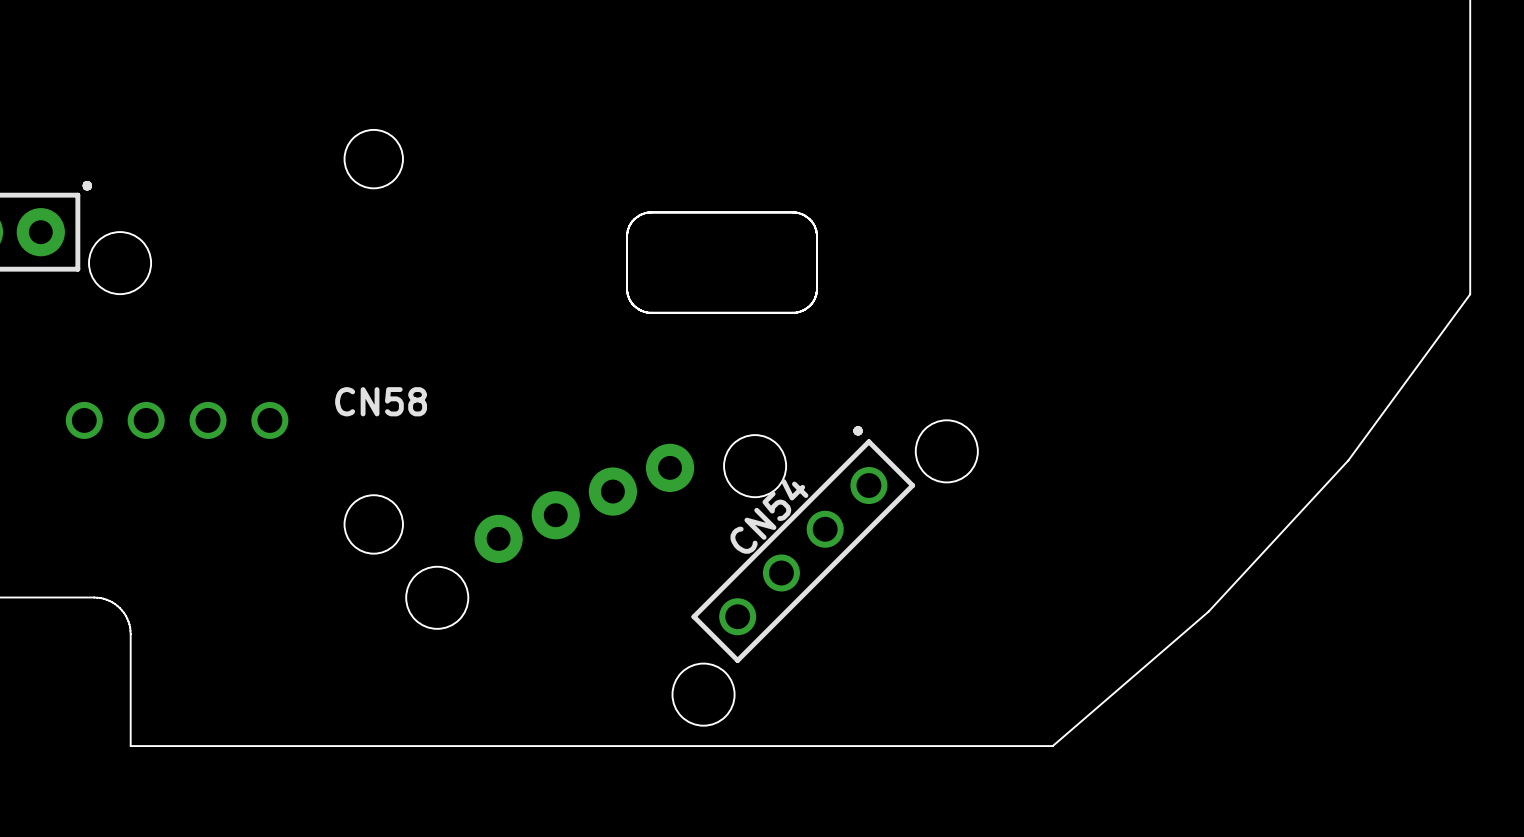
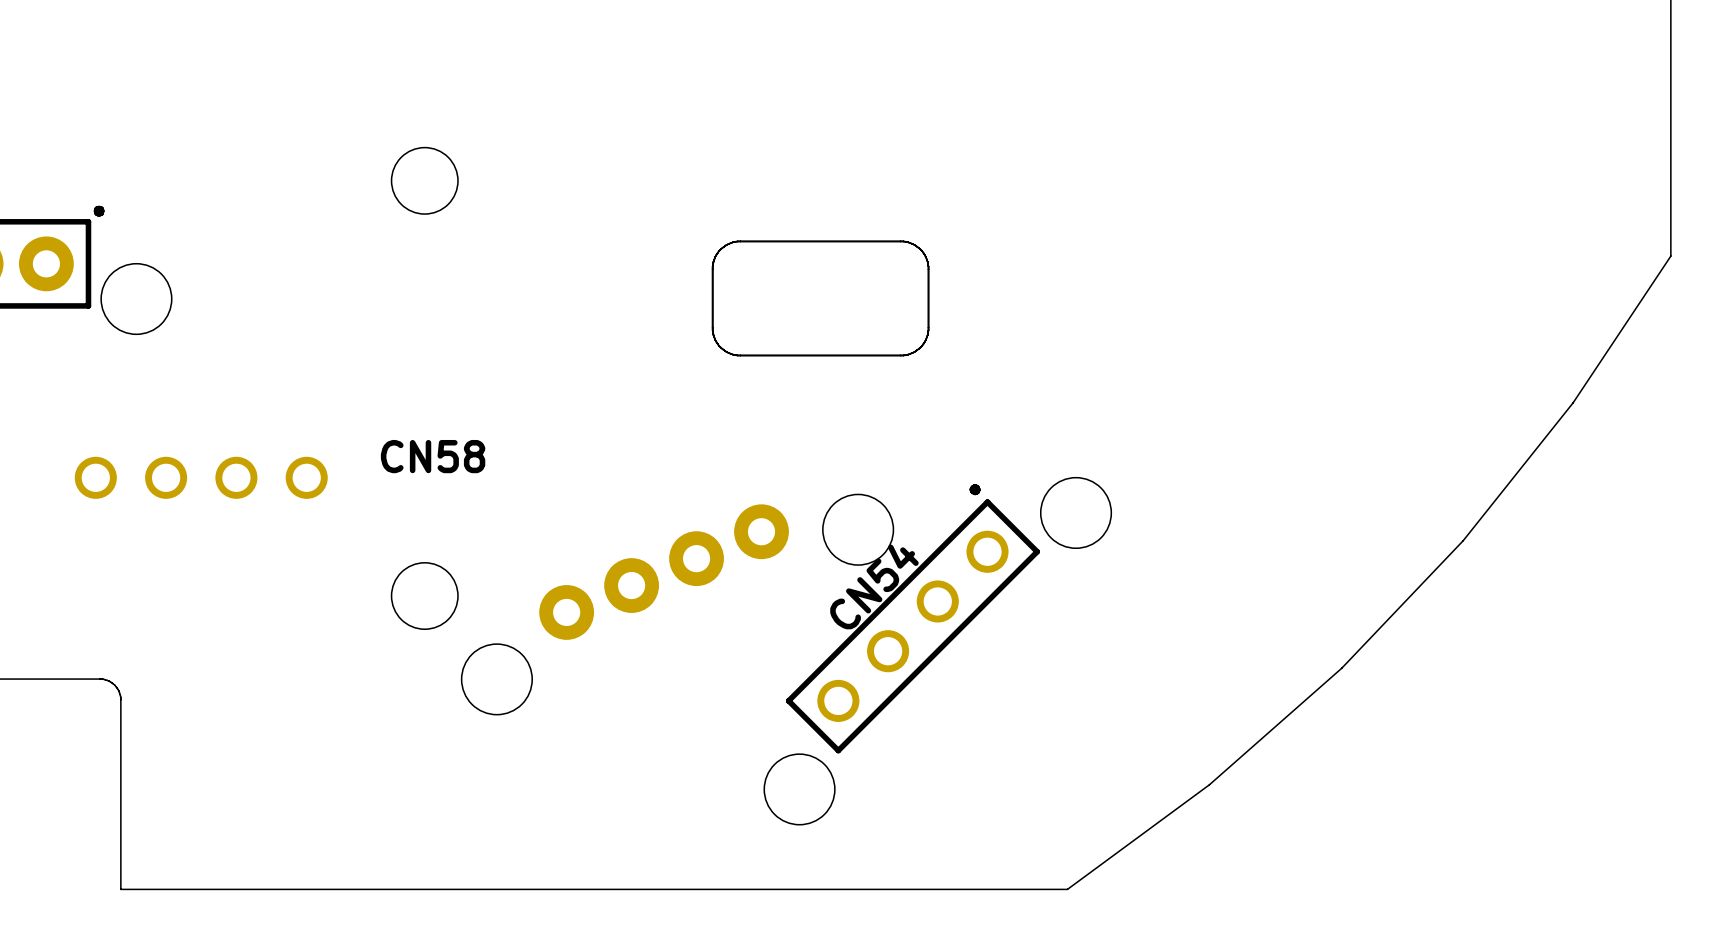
board edge: (1470, 225) (1470, 294) (1348, 460) (1208, 611) (1052, 746) (130, 746) (129, 624) (124, 613) (115, 604) (103, 598) (89, 597) -> (1670, 256) (1573, 402) (1463, 540) (1341, 668) (1209, 784) (1067, 889) (120, 889) (120, 697) (114, 685) (102, 679)

